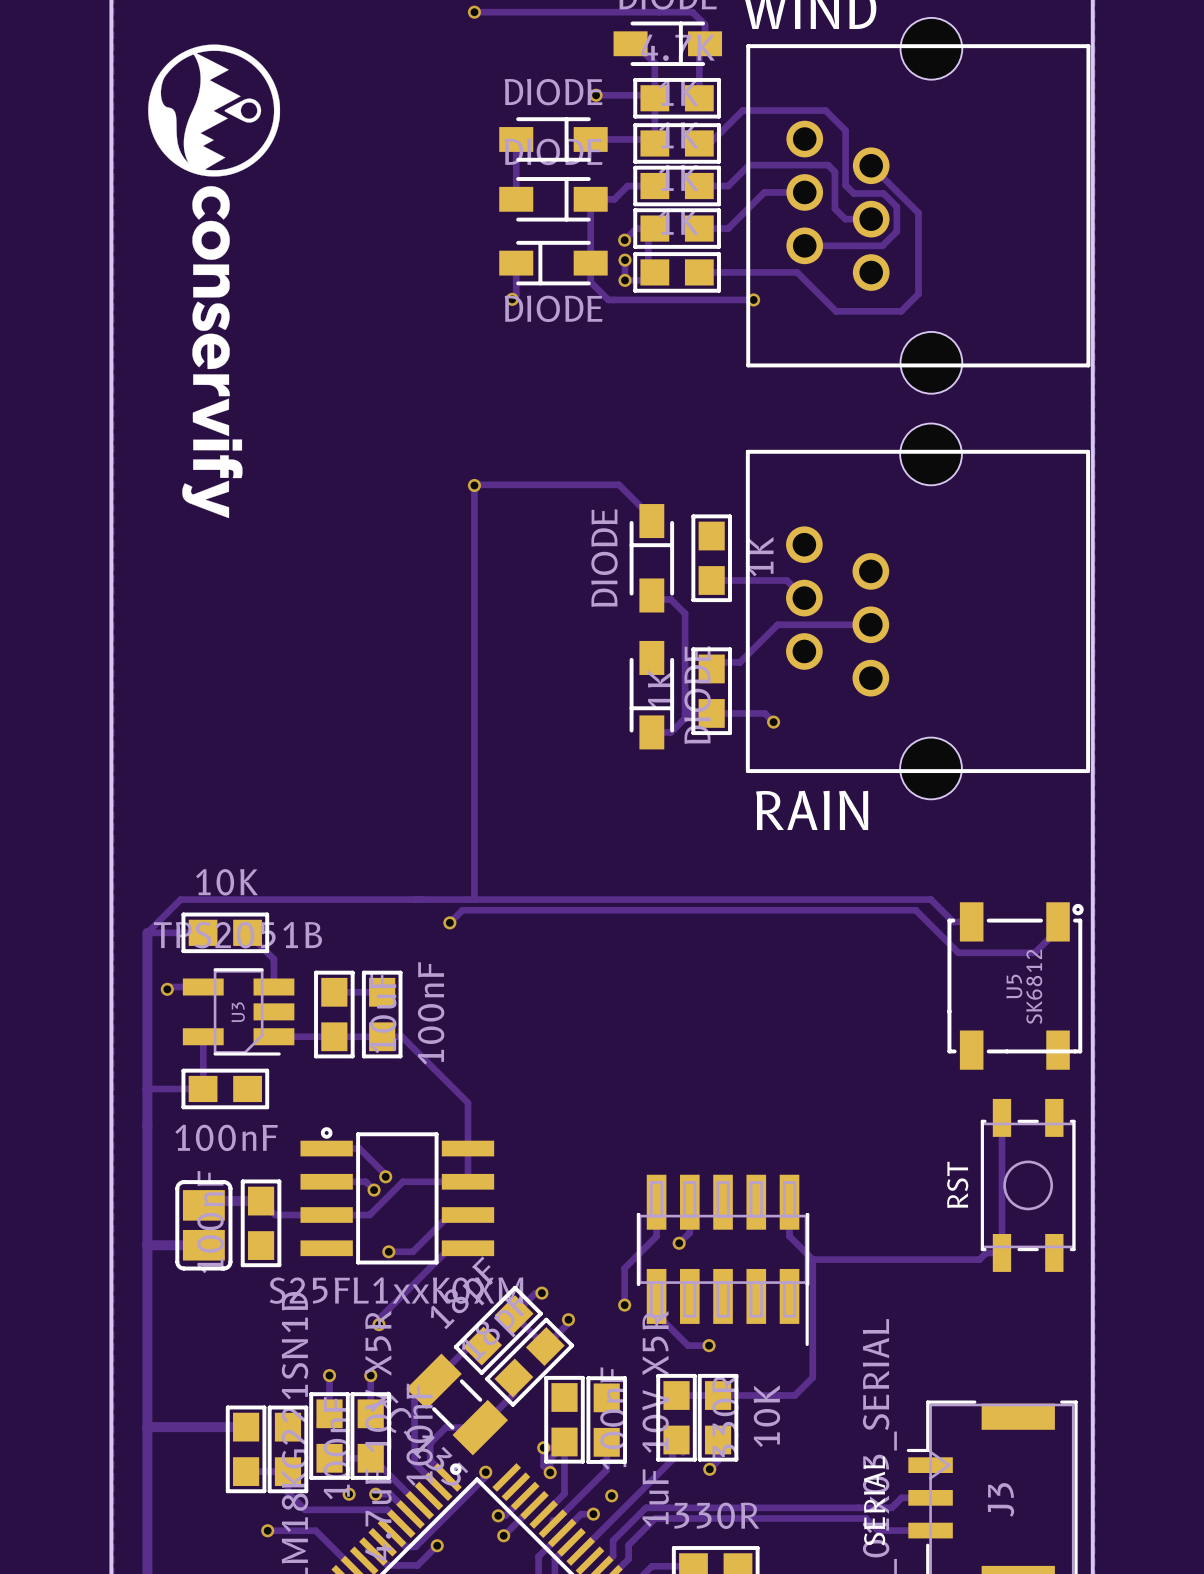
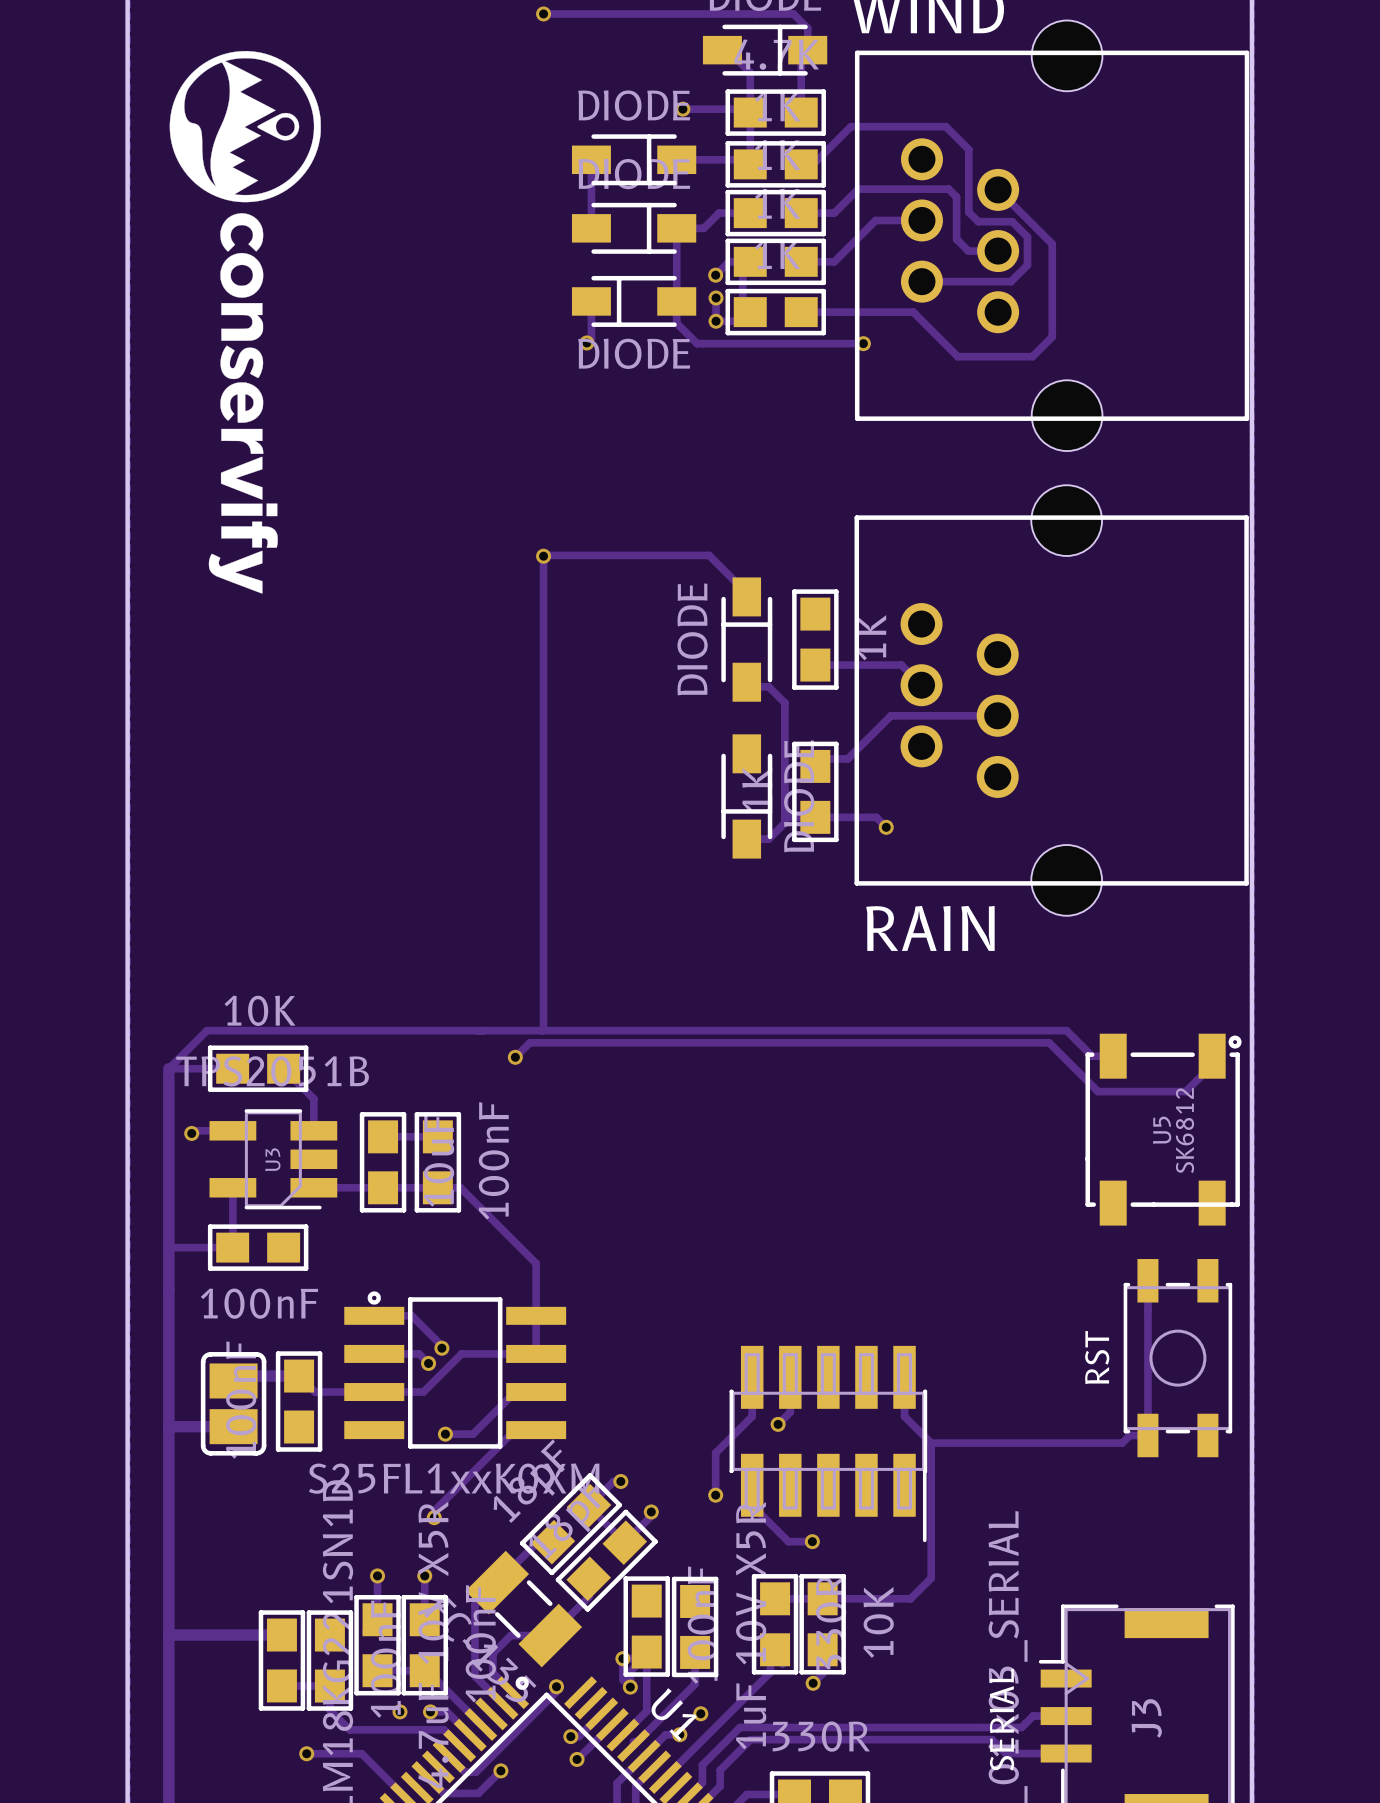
U1 name: none -> U1 (674, 1714)

